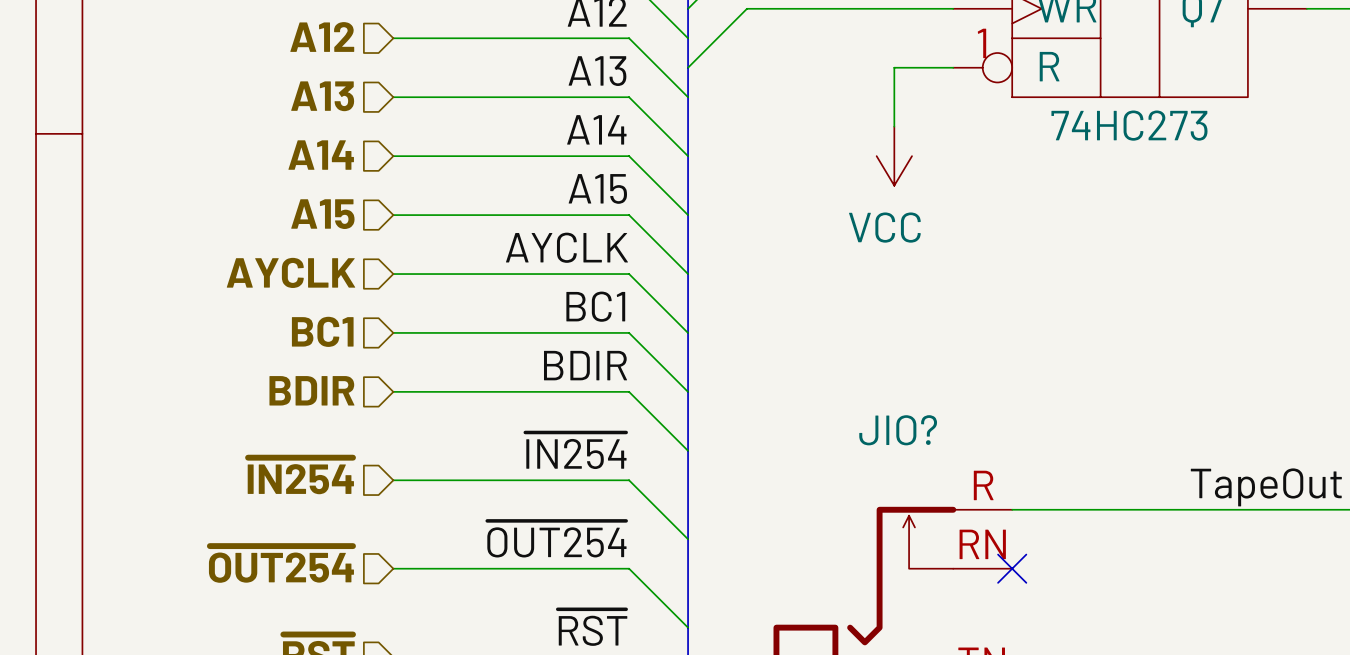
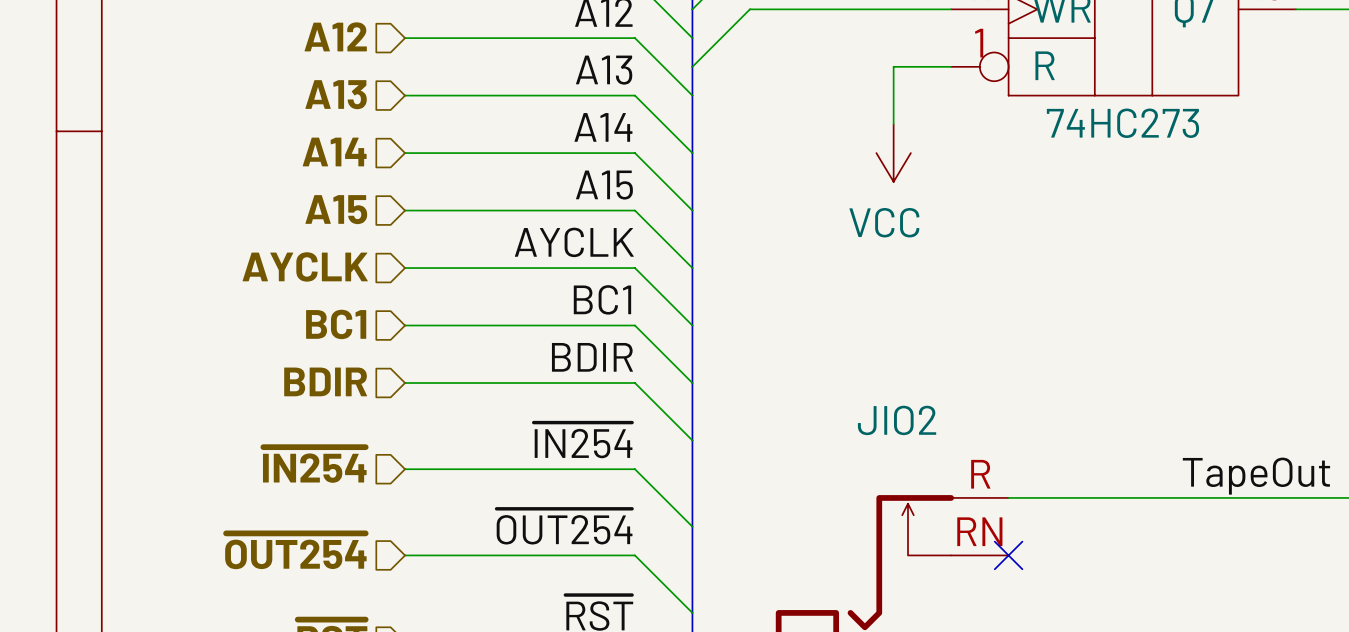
JIO? name: JIO? (898, 430) -> JIO2 (897, 420)

